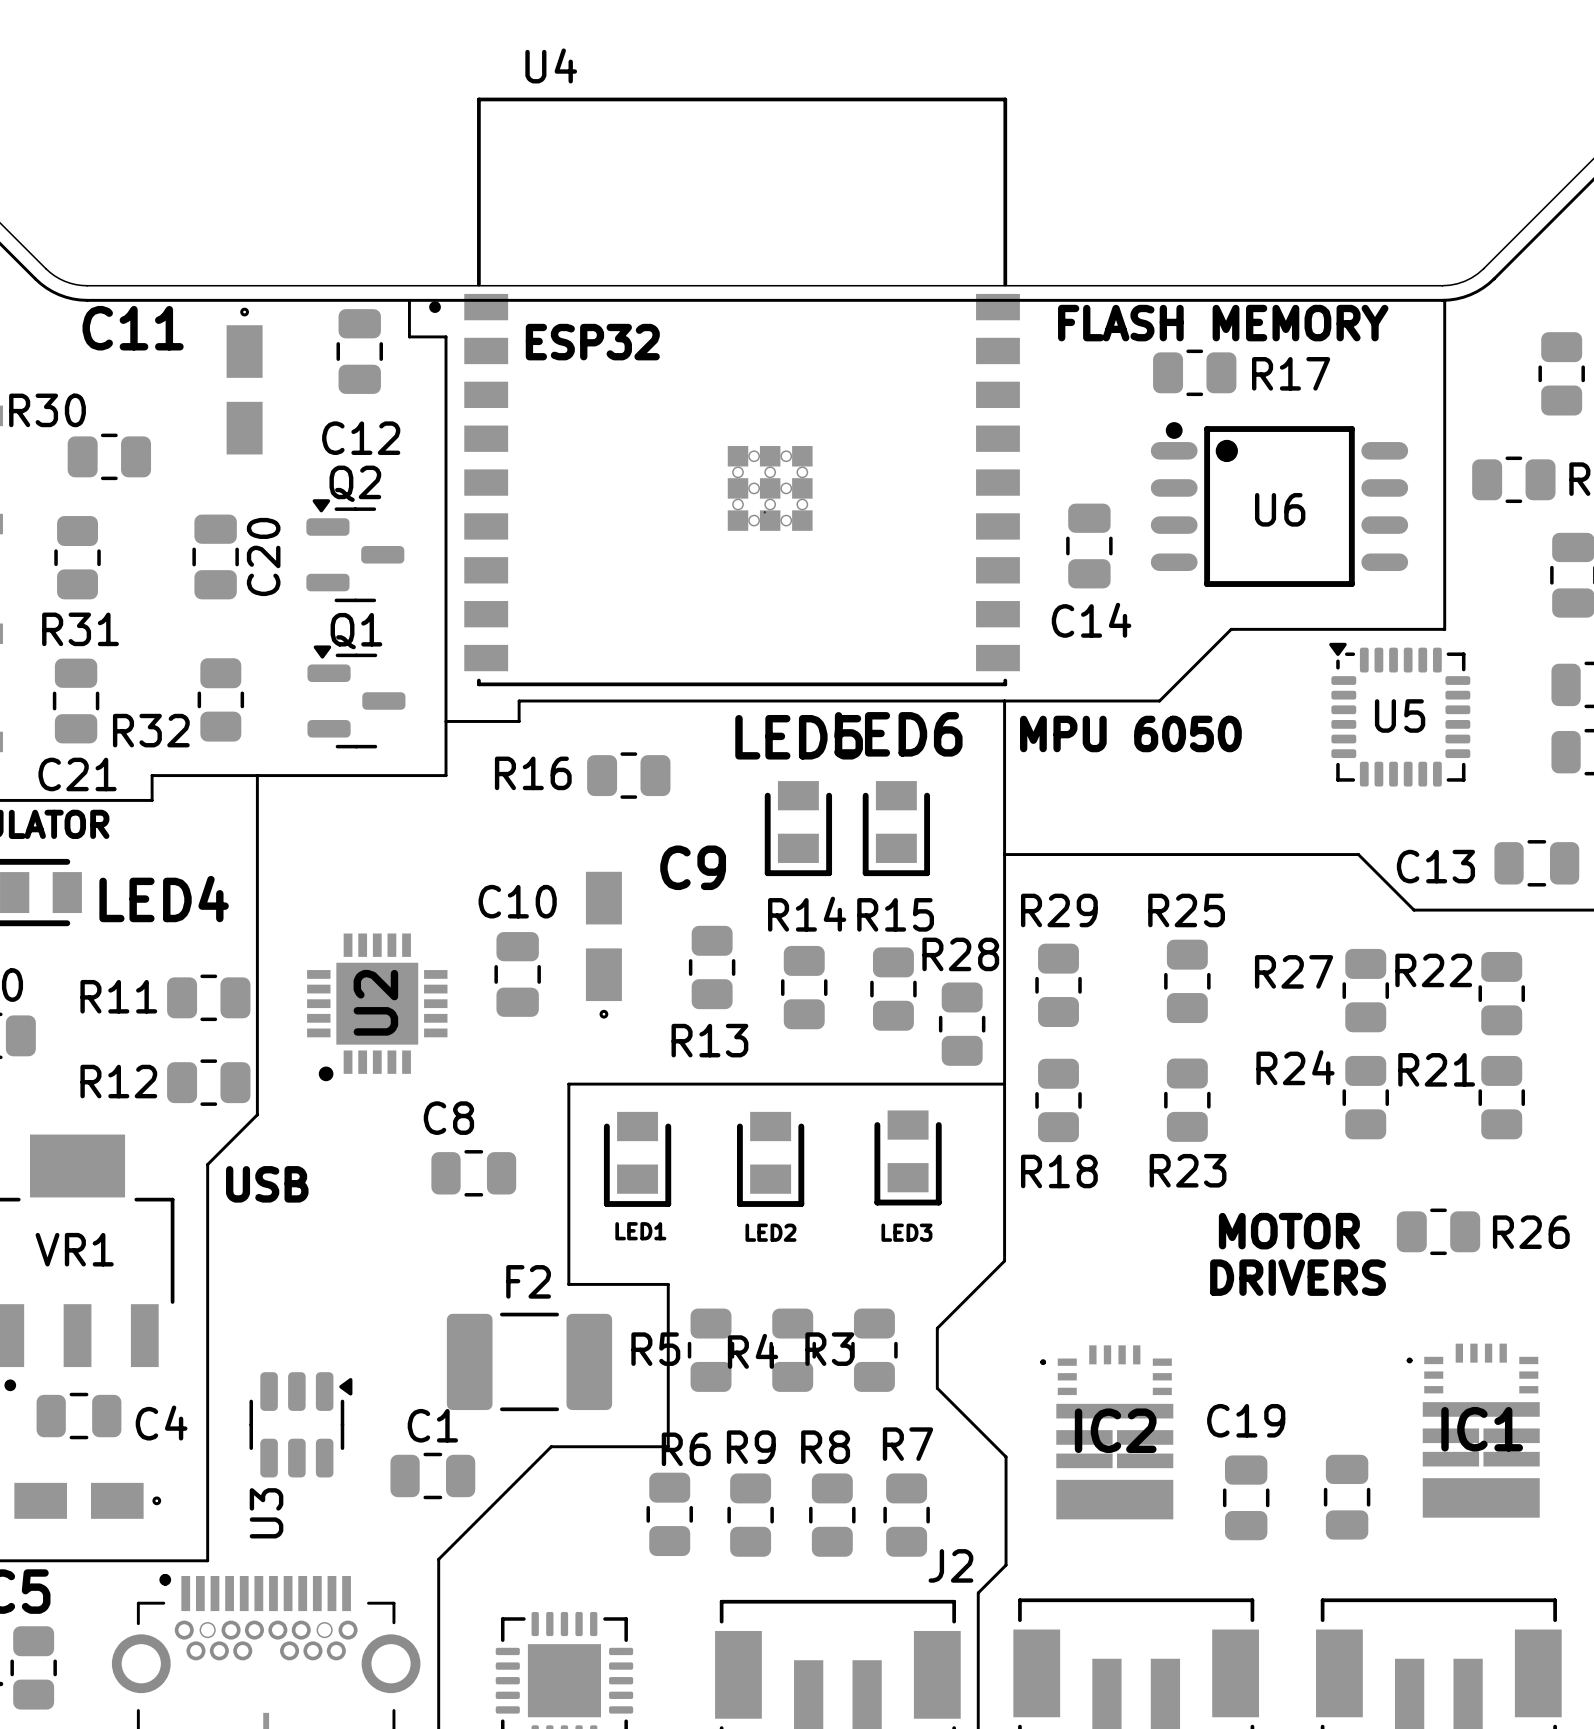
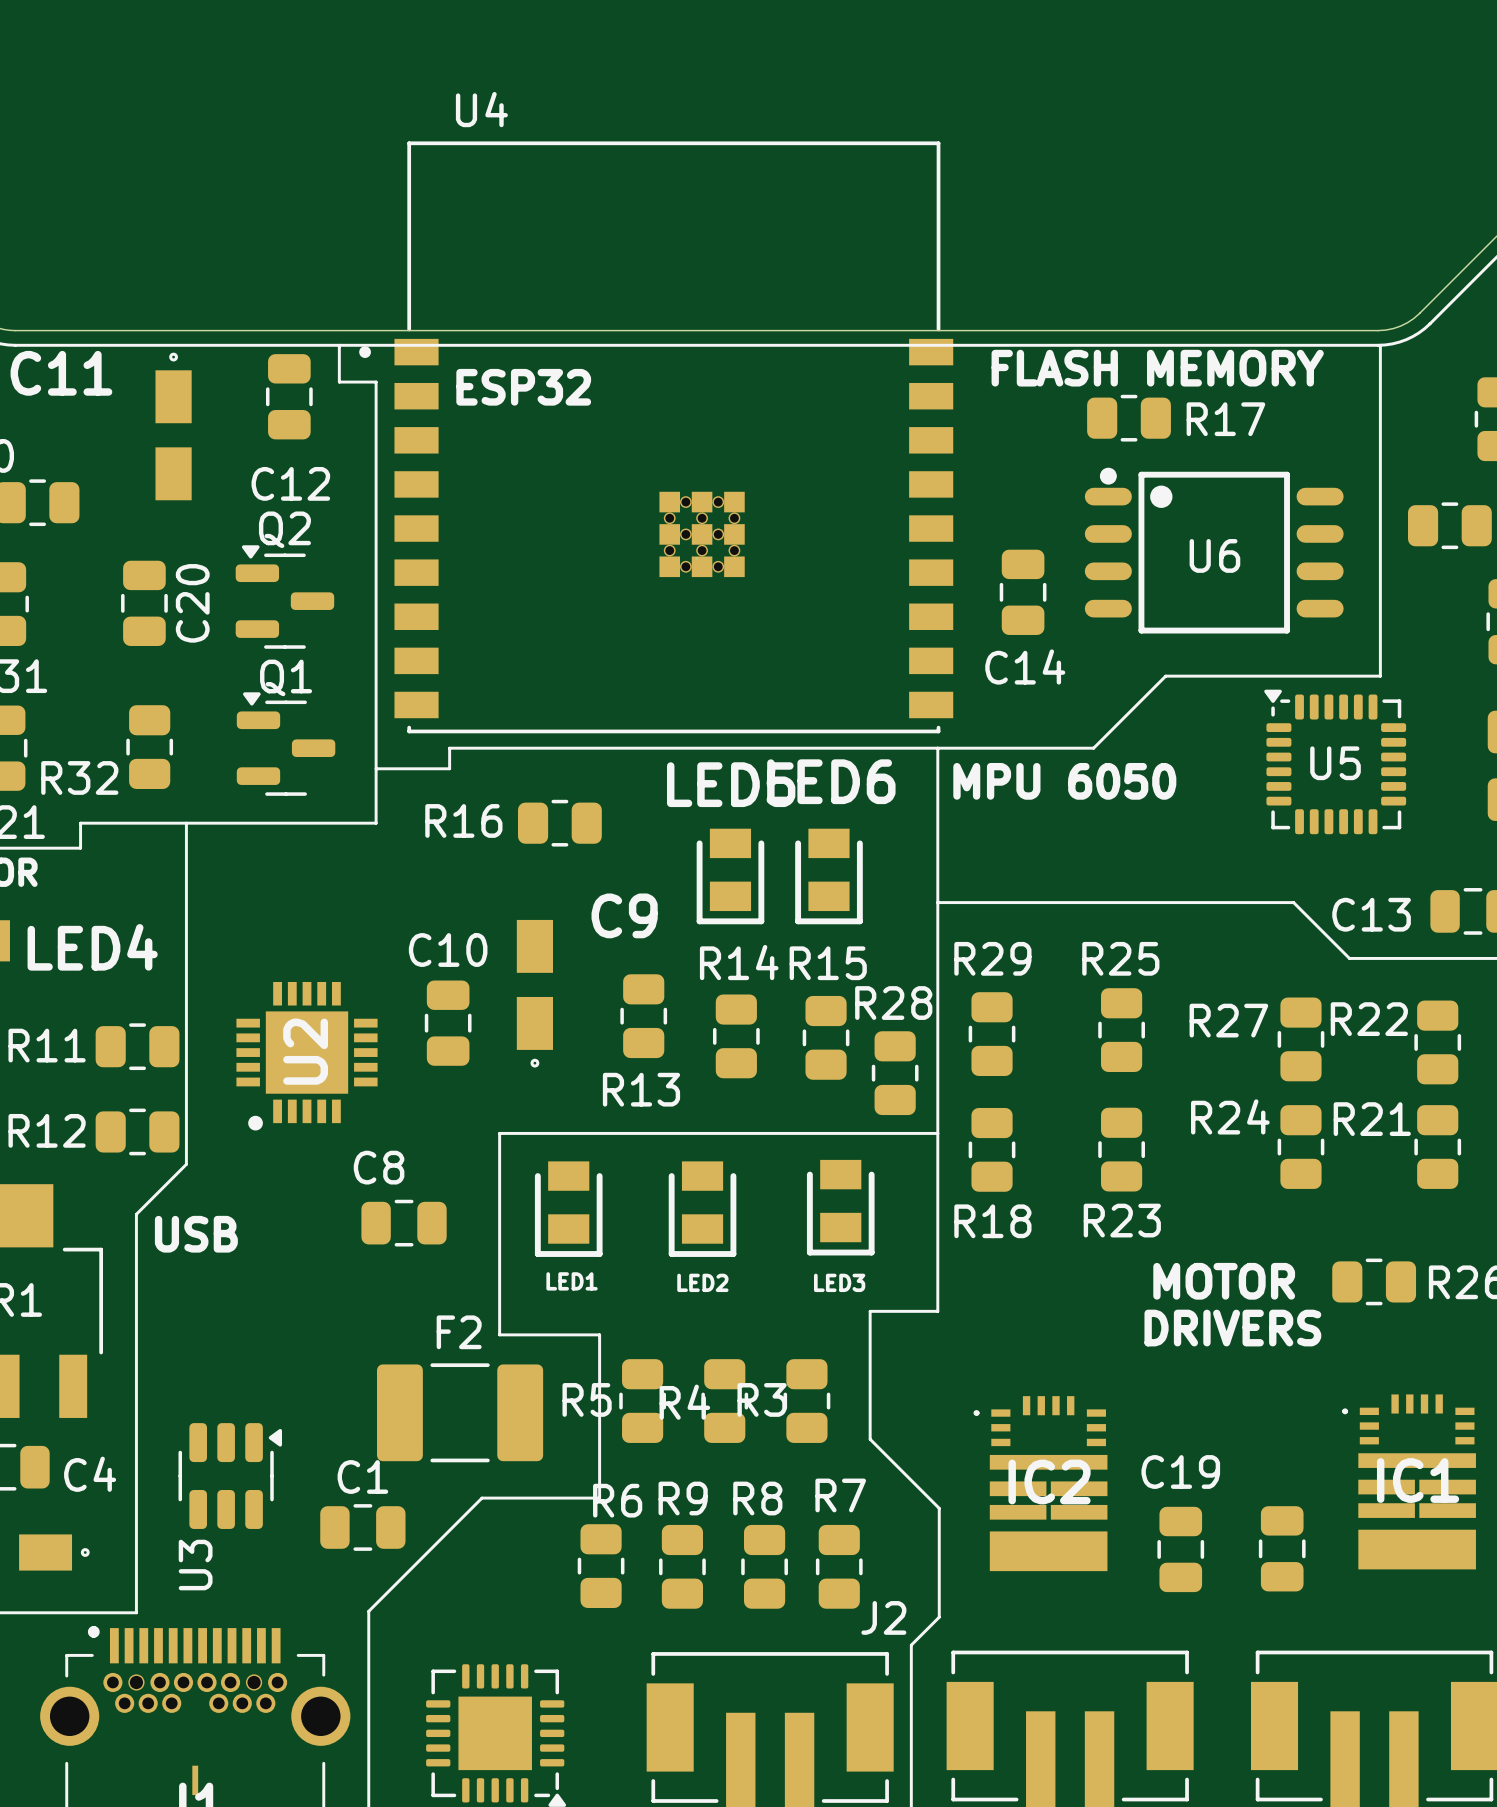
line: (1004, 1261) (937, 1328) -> (937, 1311) (870, 1311) (870, 1378)

